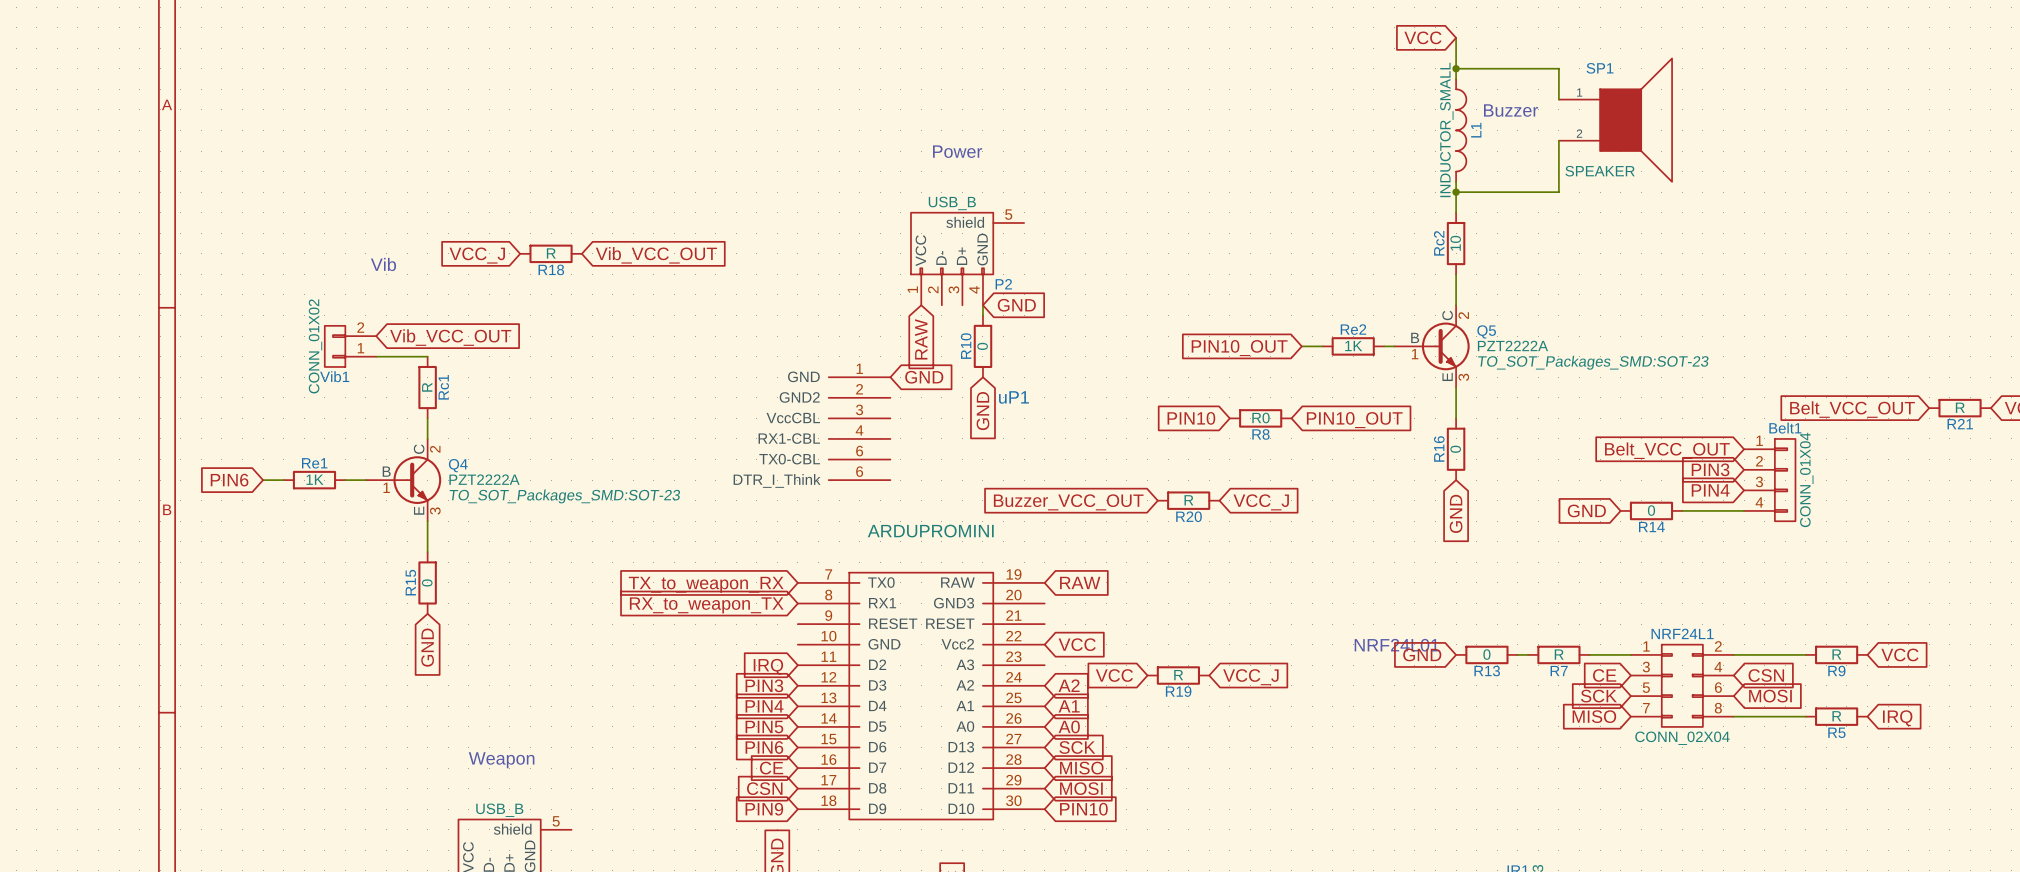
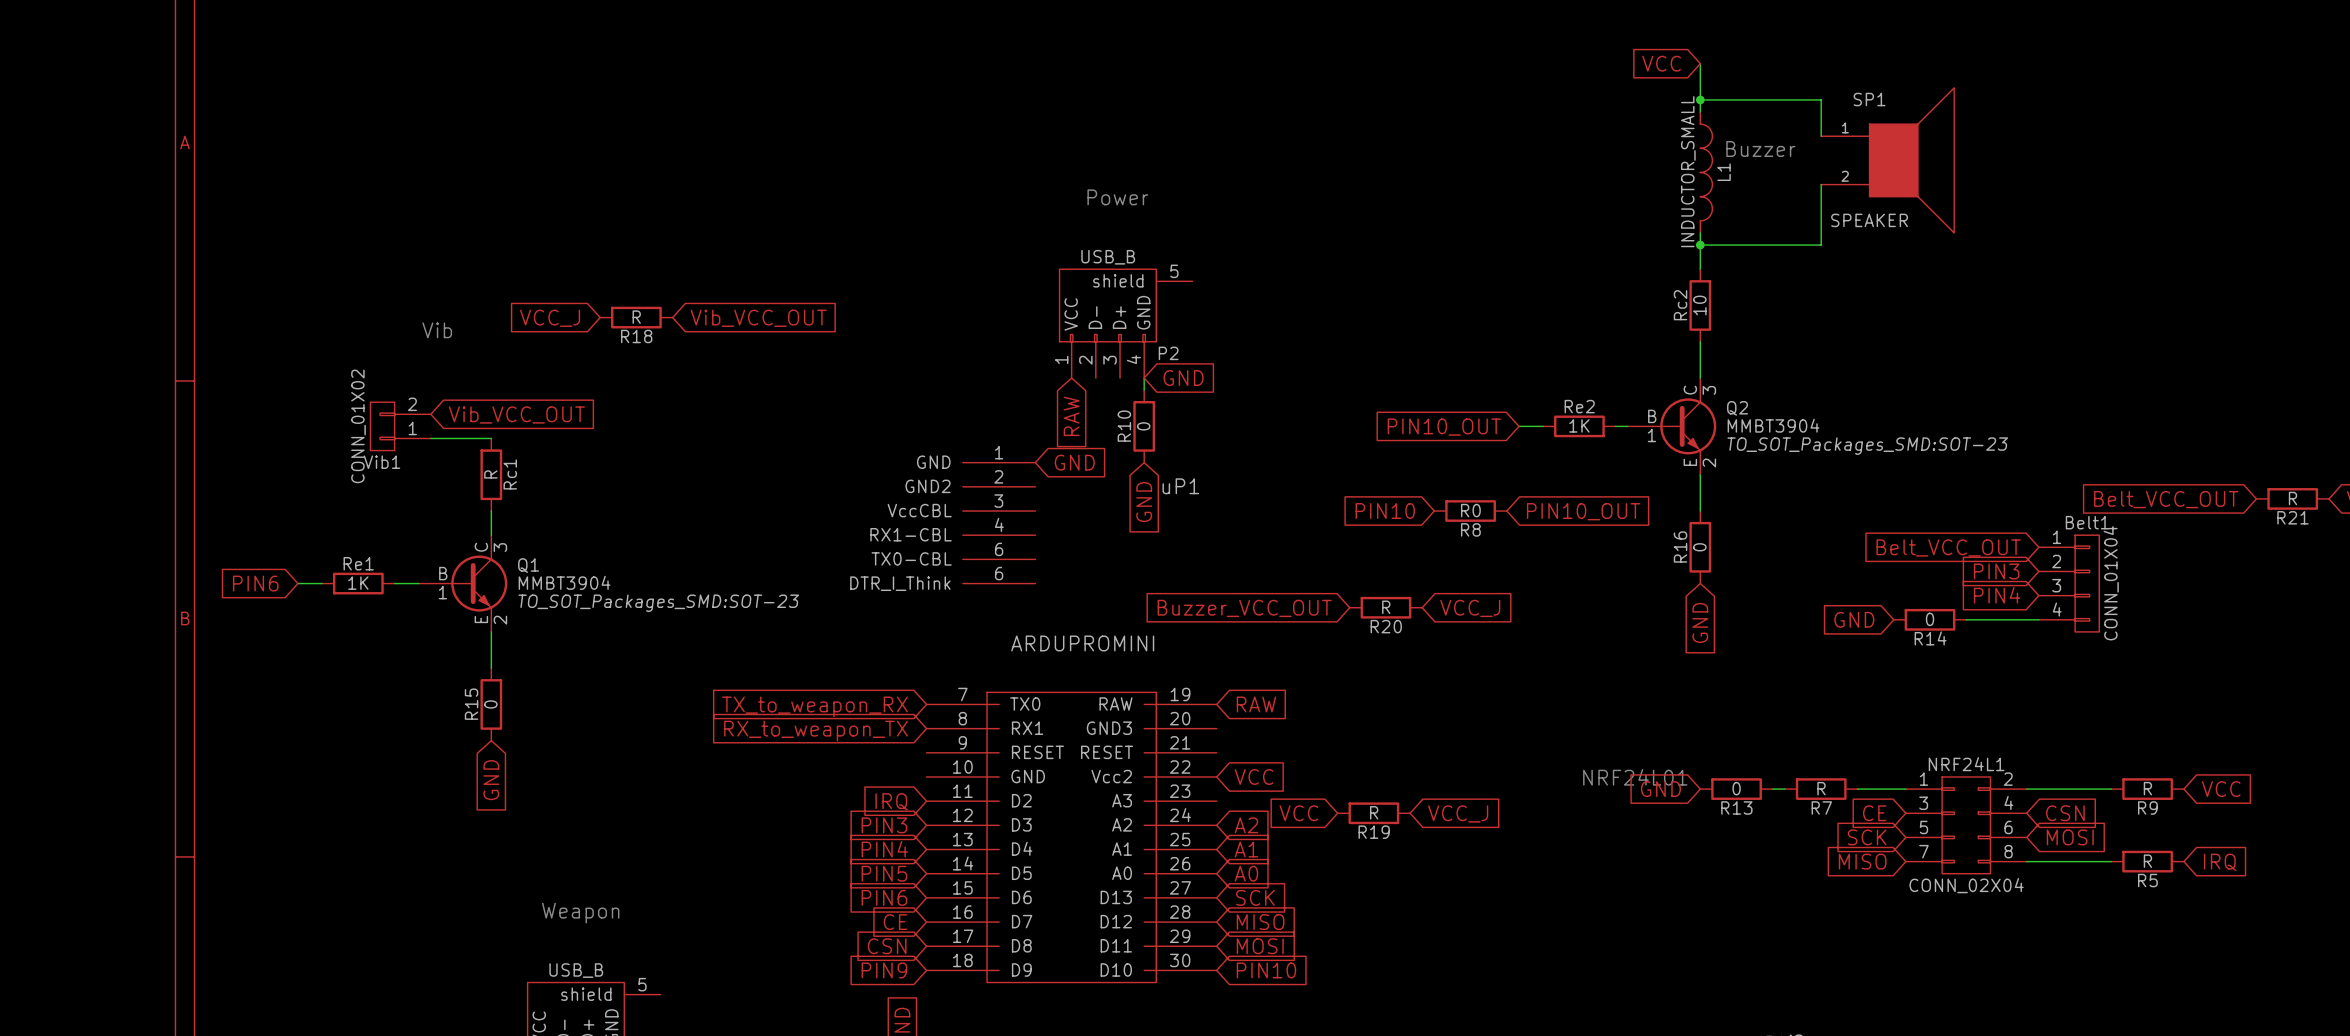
Q5: PZT2222A (1432, 346) -> none
Q2: none -> MMBT3904 (1672, 426)
Q4: PZT2222A (403, 480) -> none
Q1: none -> MMBT3904 (463, 583)

